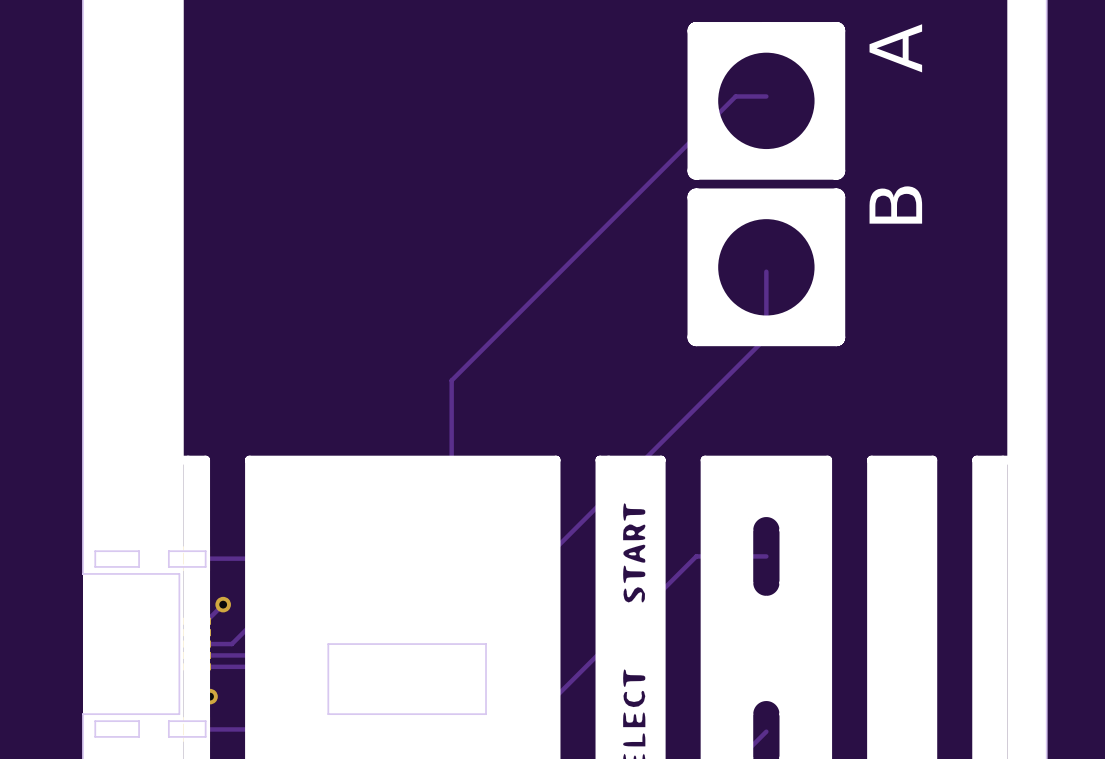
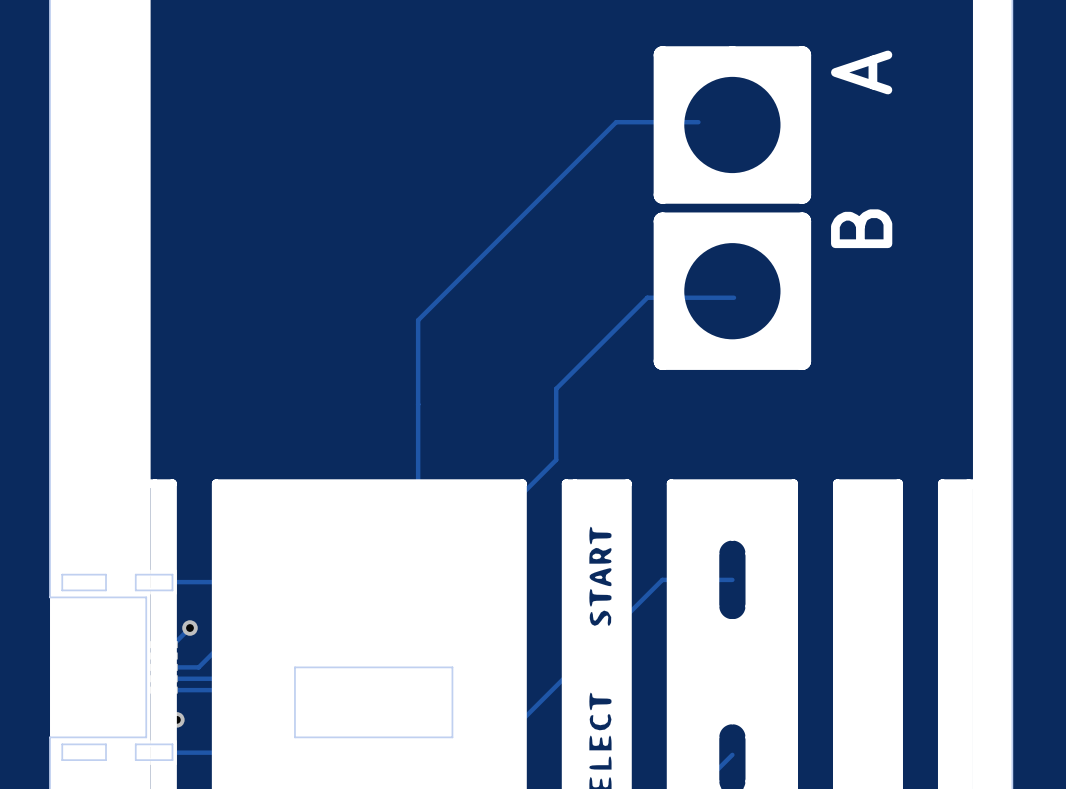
track: (766, 96) (735, 96) (451, 380) -> (698, 122) (616, 122) (418, 320) (418, 404)
track: (766, 271) (766, 337) (473, 630) -> (733, 297) (647, 297) (556, 388) (556, 459) (440, 575) (440, 653)

